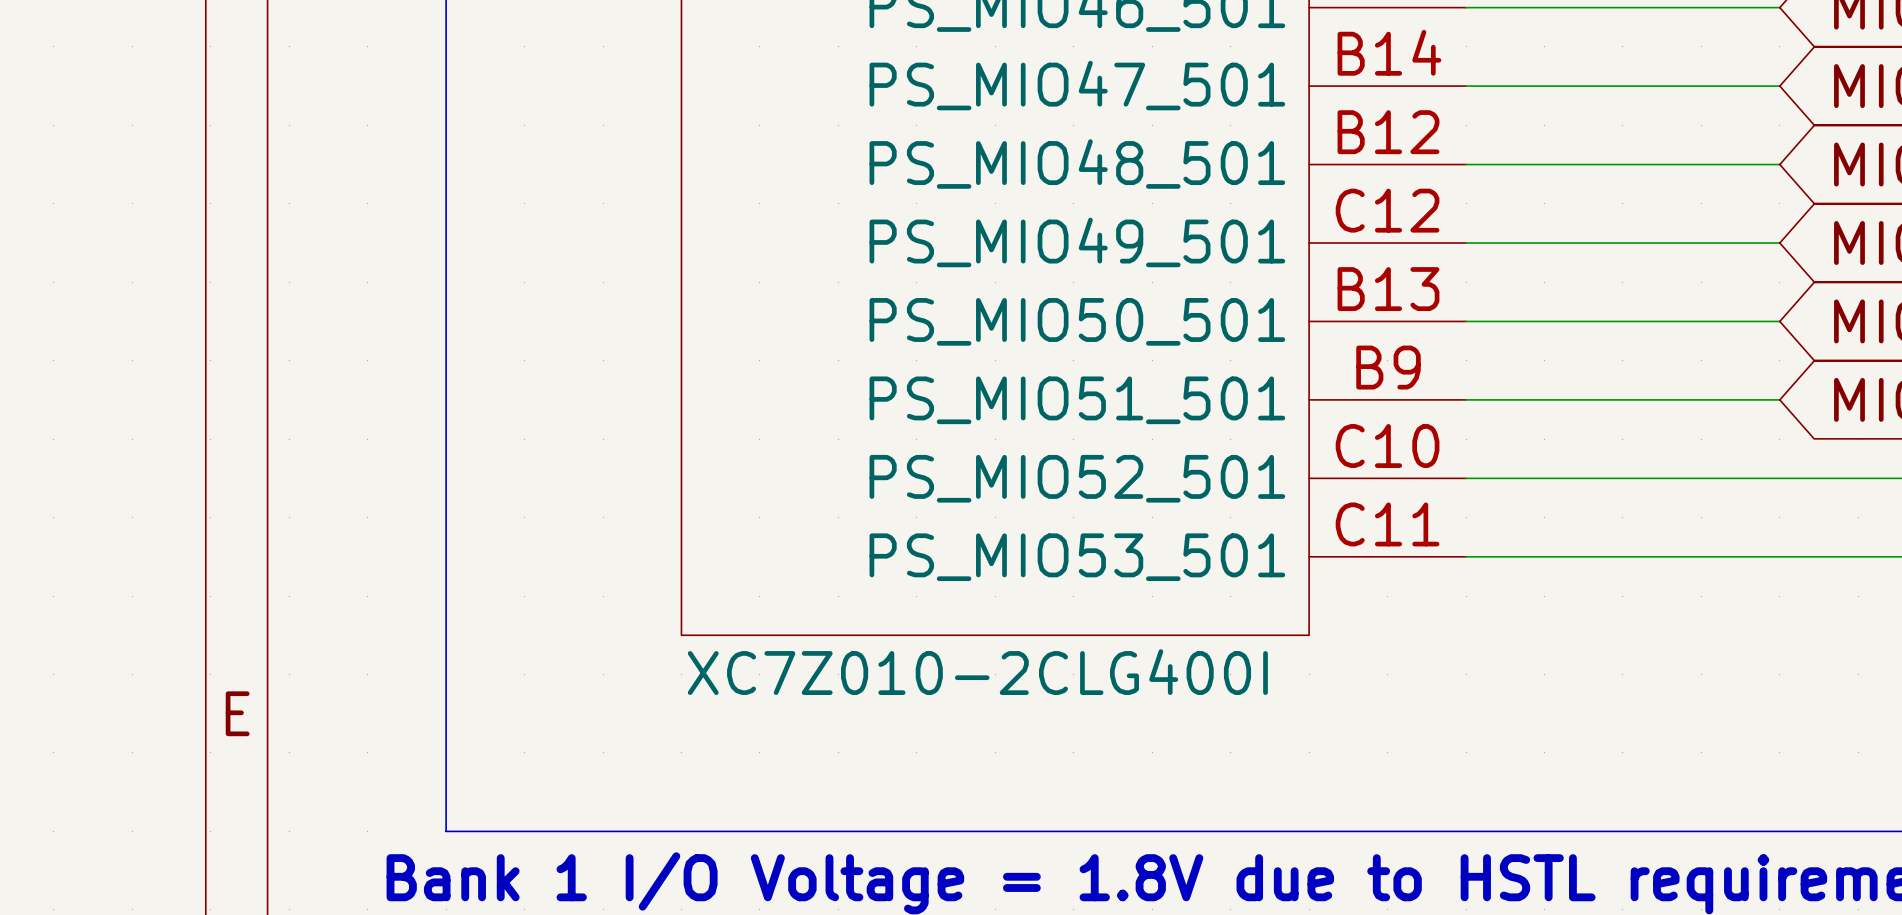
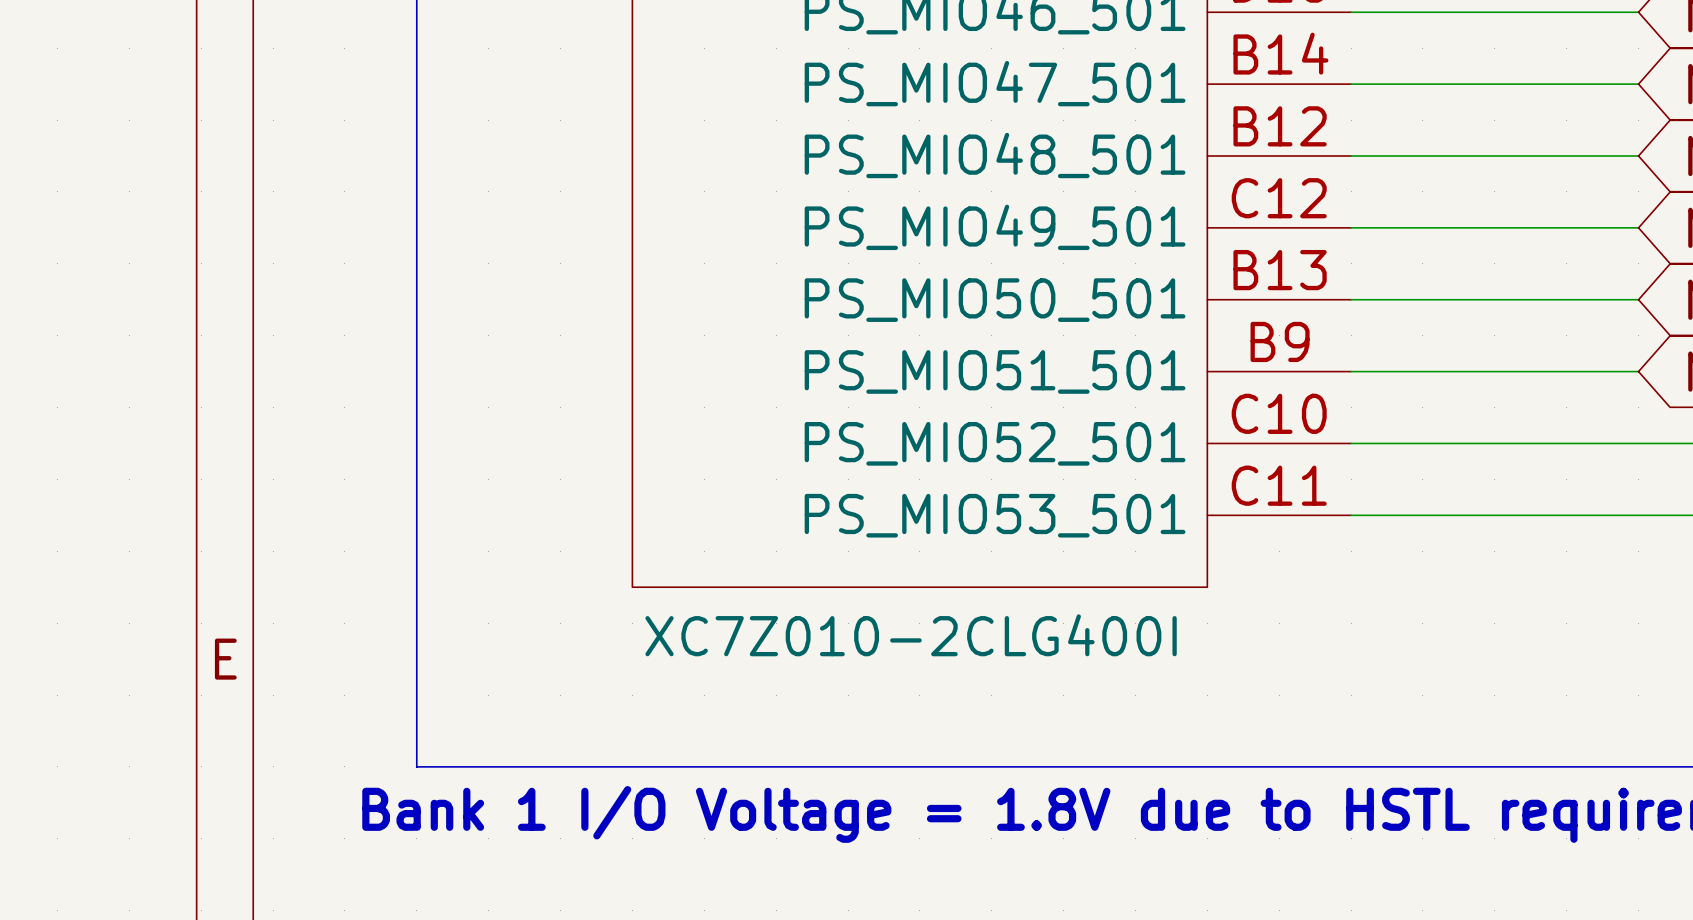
part value position: XC7Z010-2CLG400I (977, 672) -> XC7Z010-2CLG400I (911, 635)

